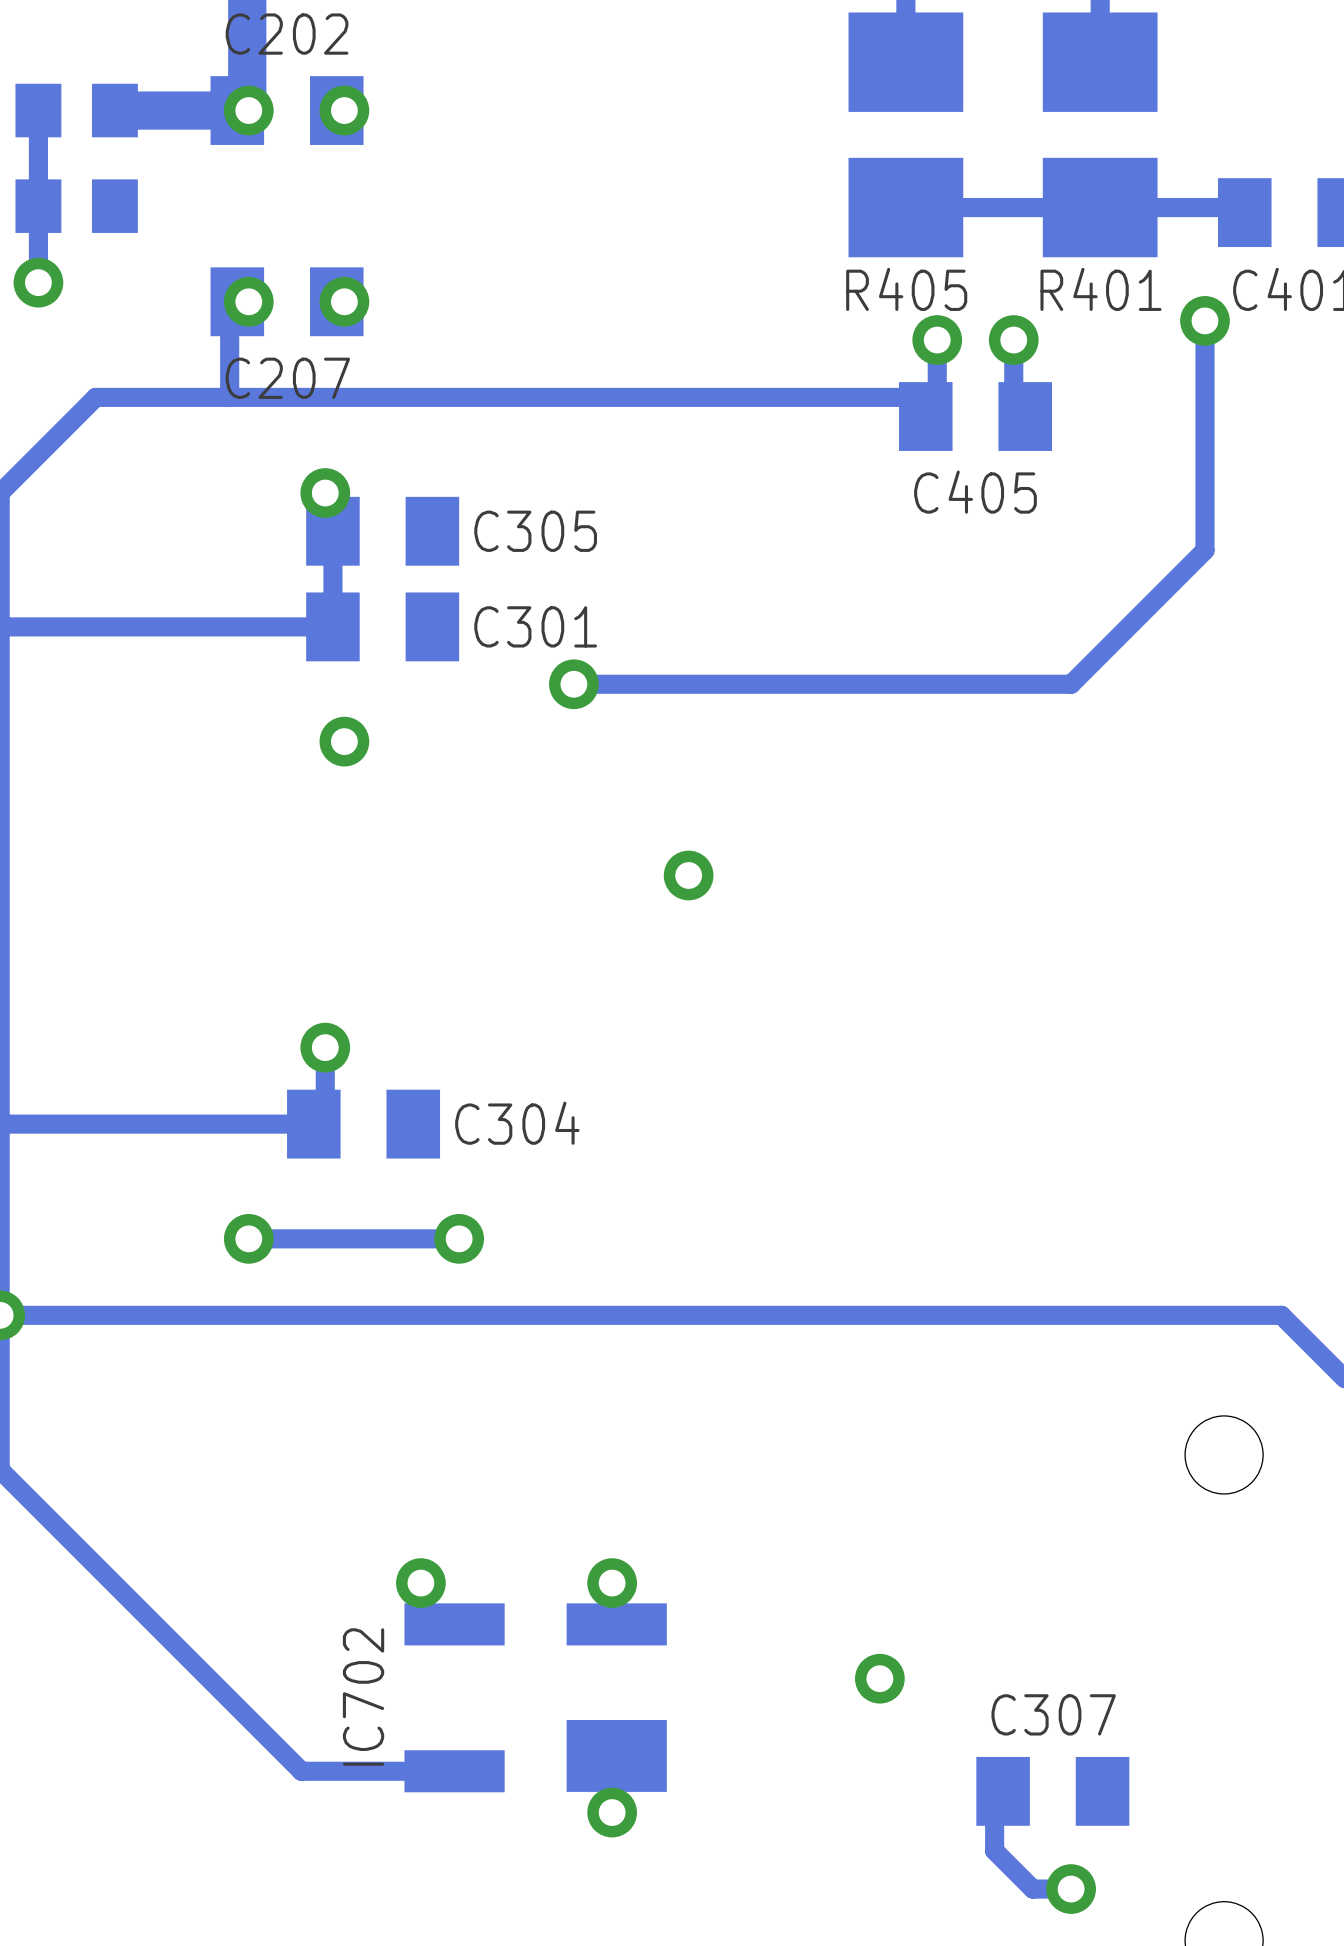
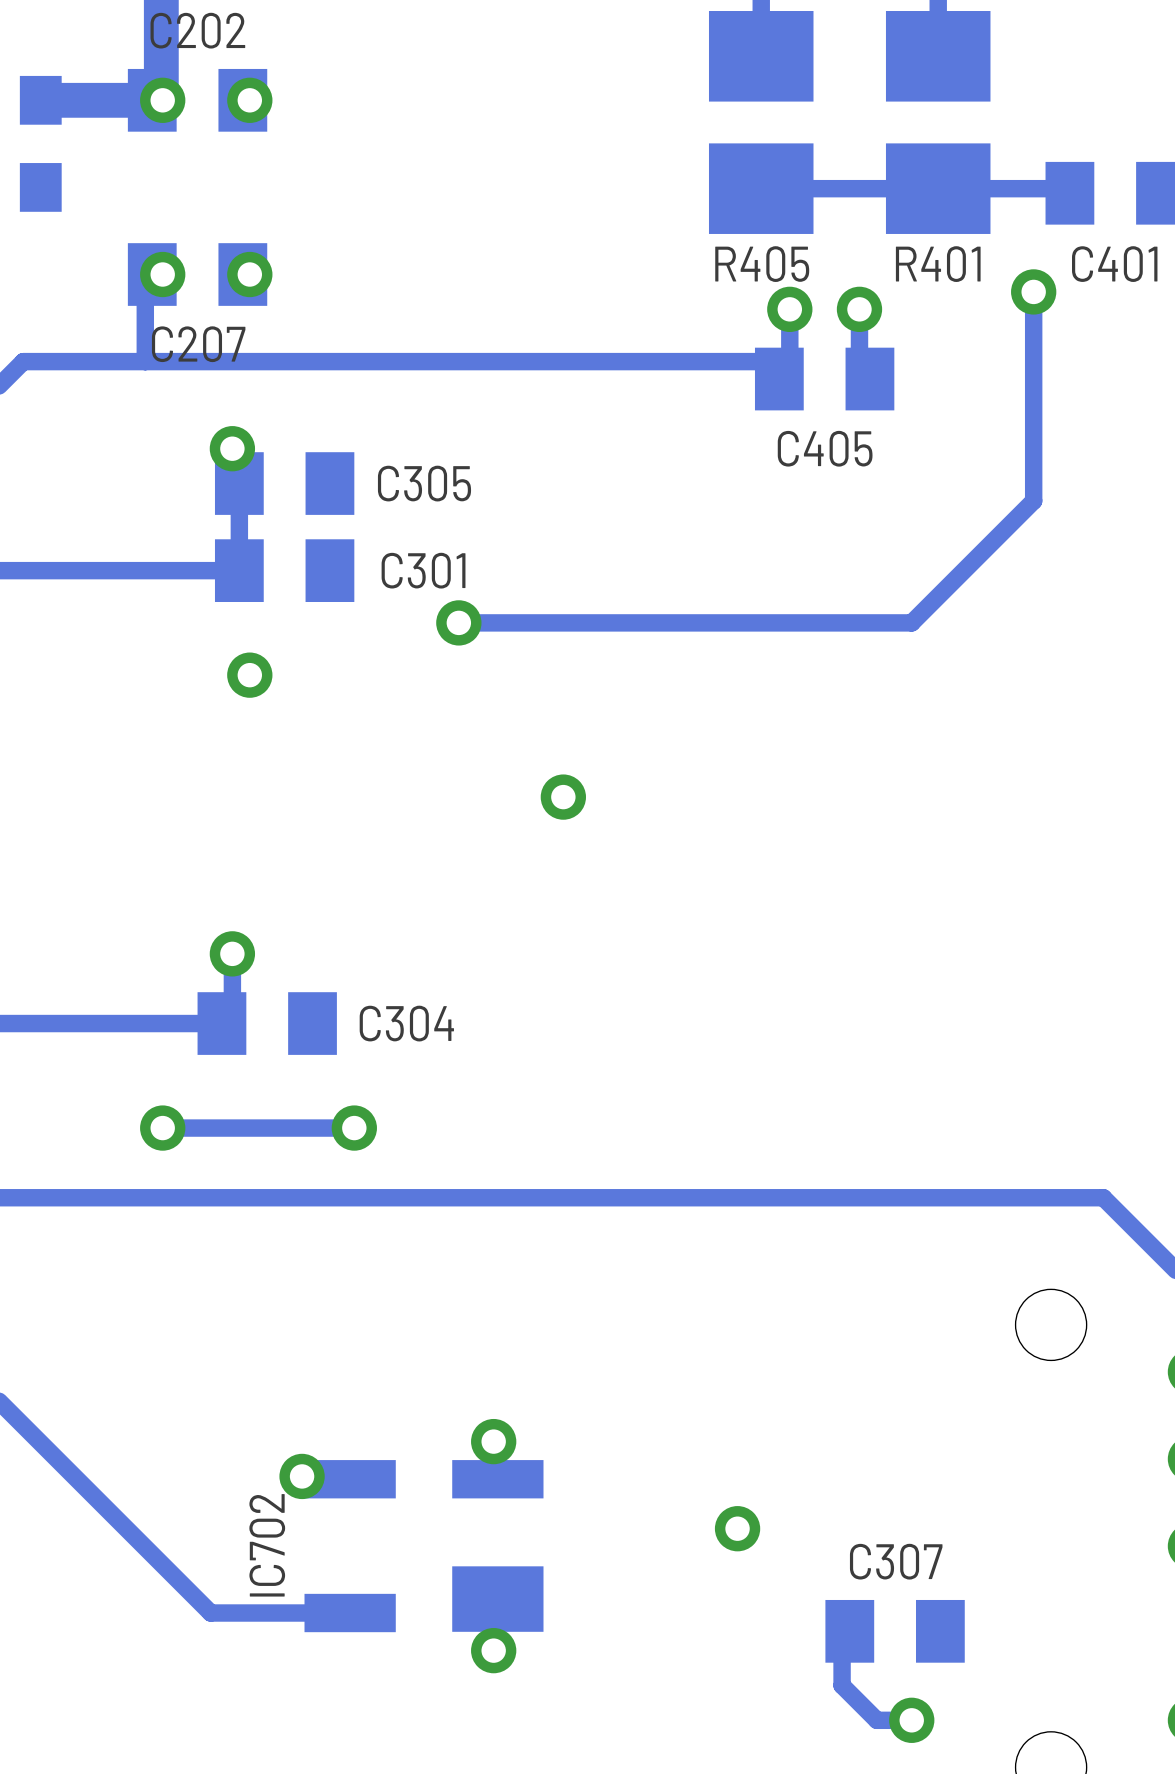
via position: (420, 1583) -> (302, 1476)

